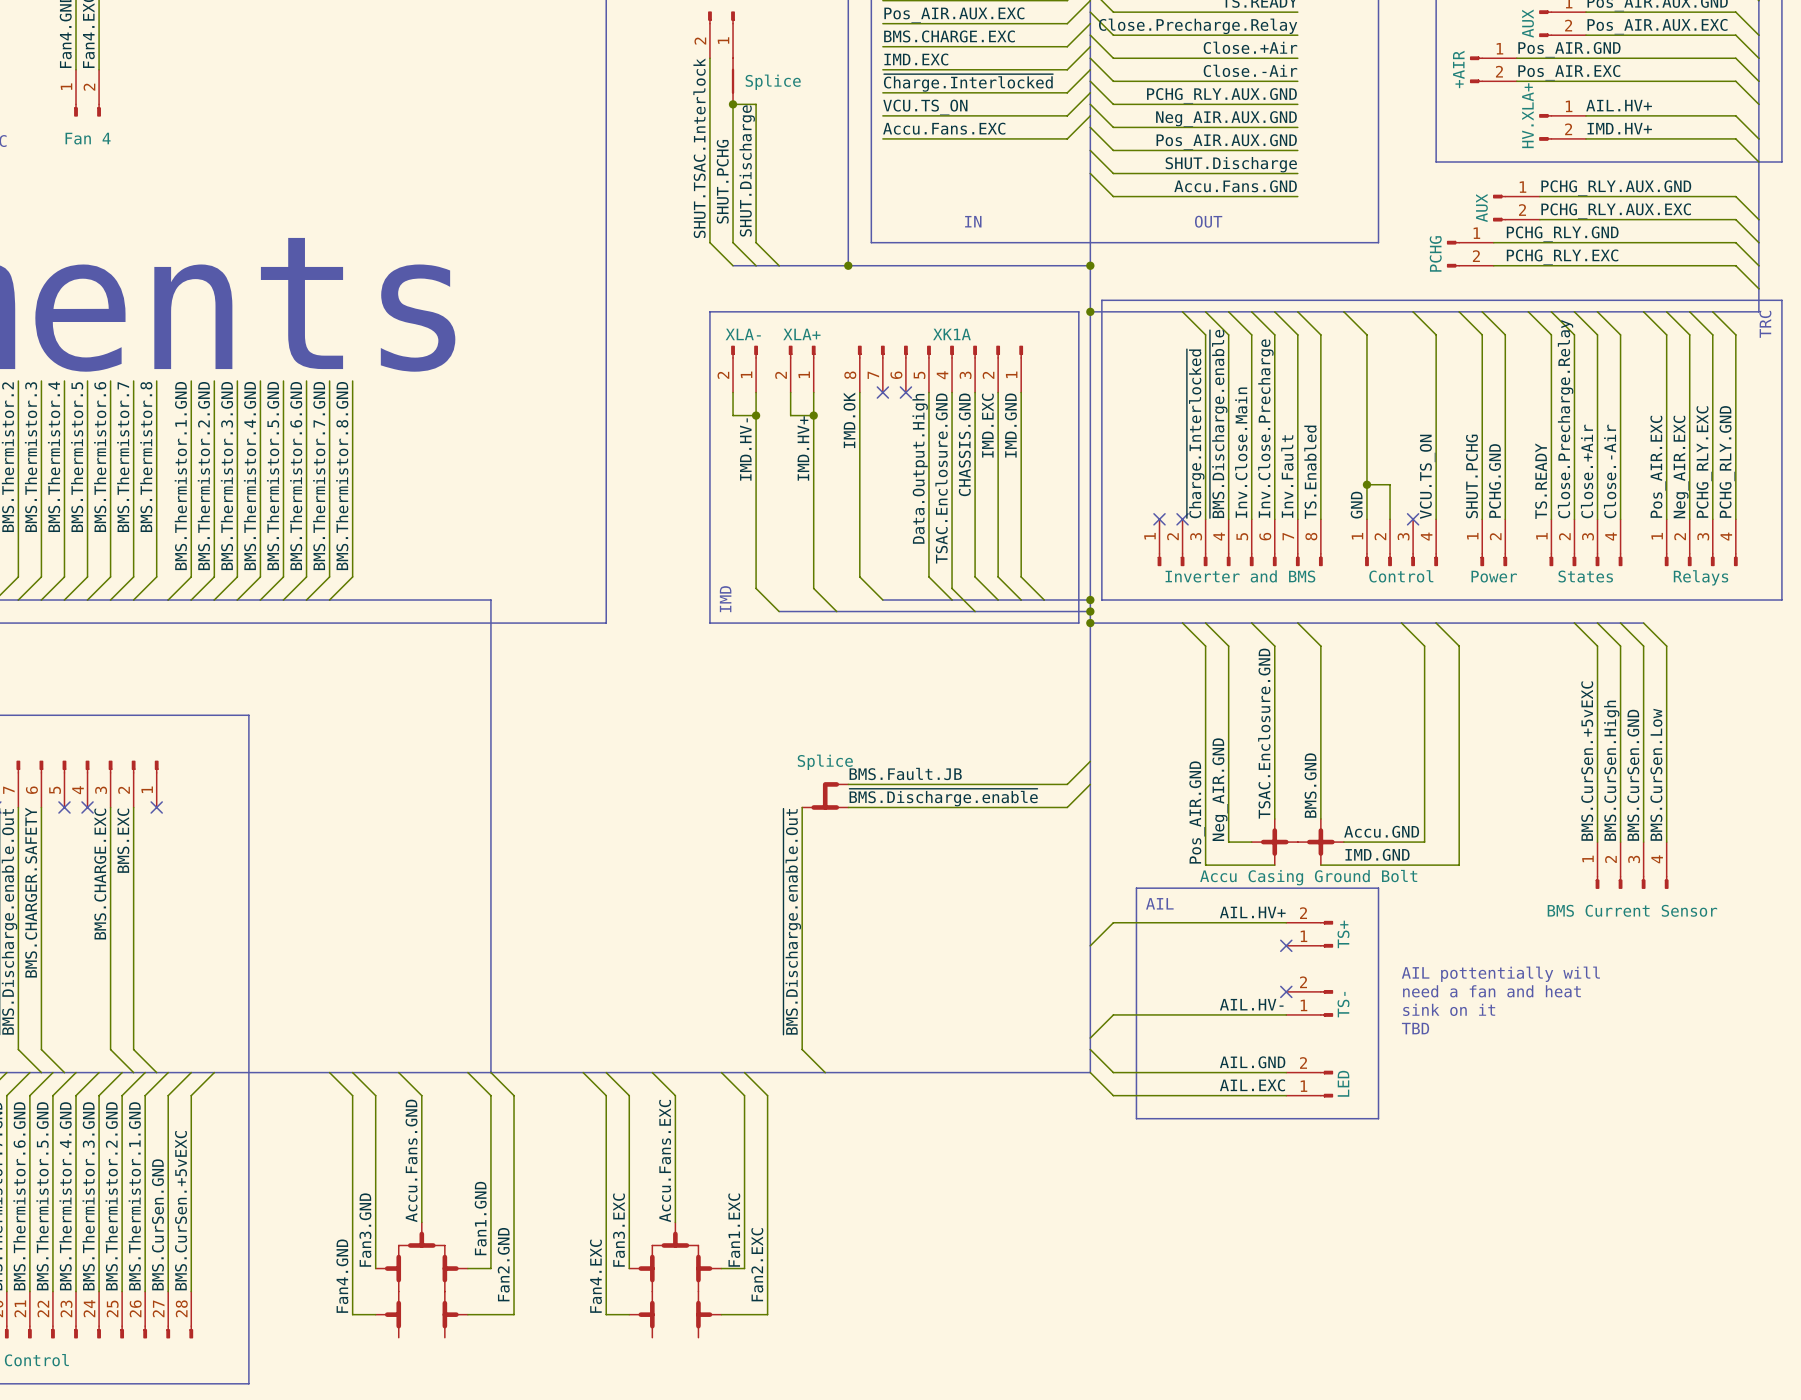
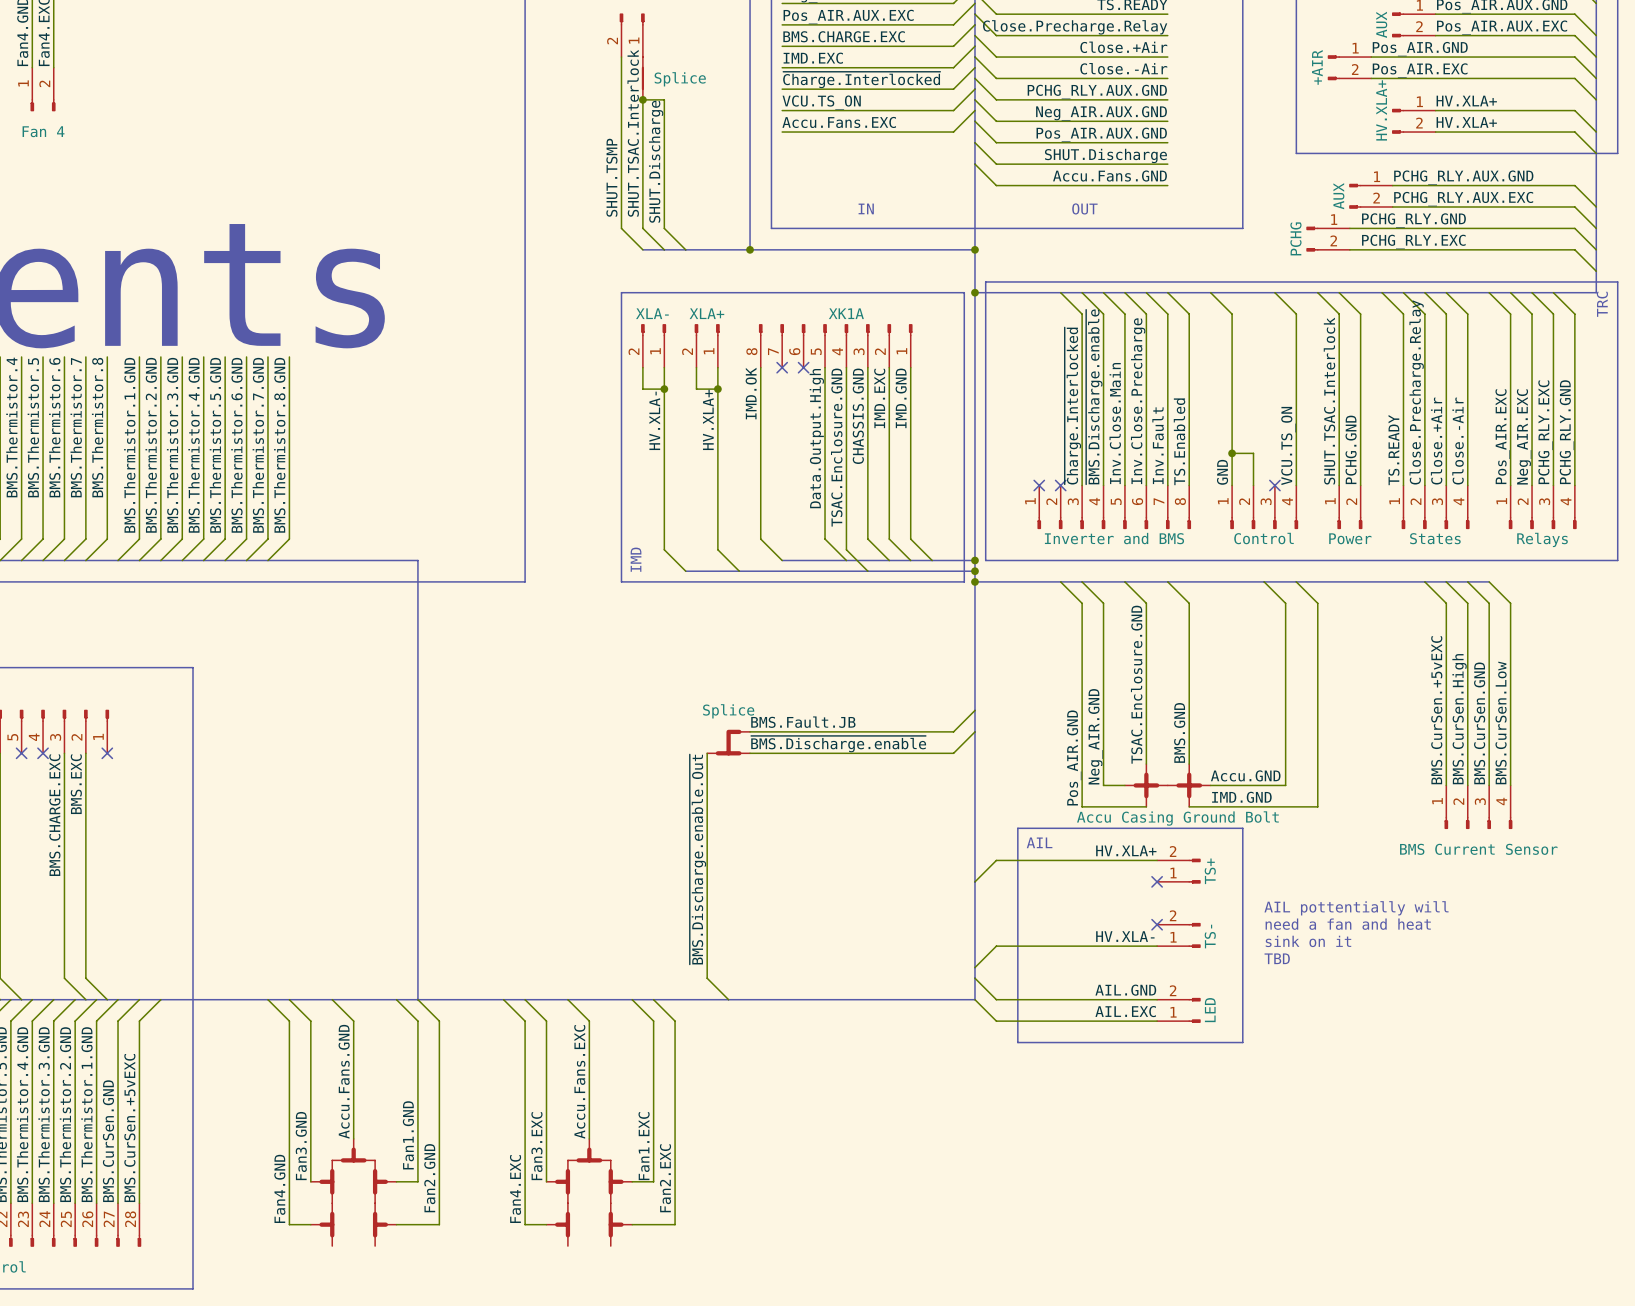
label: AIL.HV+ (1619, 105) -> HV.XLA+ (1466, 101)
label: IMD.HV+ (1619, 128) -> HV.XLA+ (1466, 122)
label position: SHUT.TSAC.Interlock (699, 148) -> SHUT.TSAC.Interlock (633, 133)
label: SHUT.PCHG (722, 181) -> SHUT.TSMP (611, 177)
label: IMD.HV+ (803, 448) -> HV.XLA+ (708, 419)
label: IMD.HV- (745, 449) -> HV.XLA- (654, 420)
label: SHUT.PCHG (1471, 476) -> SHUT.TSAC.Interlock (1329, 401)
label: AIL.HV+ (1252, 912) -> HV.XLA+ (1126, 850)
label: AIL.HV- (1251, 1004) -> HV.XLA- (1125, 936)

